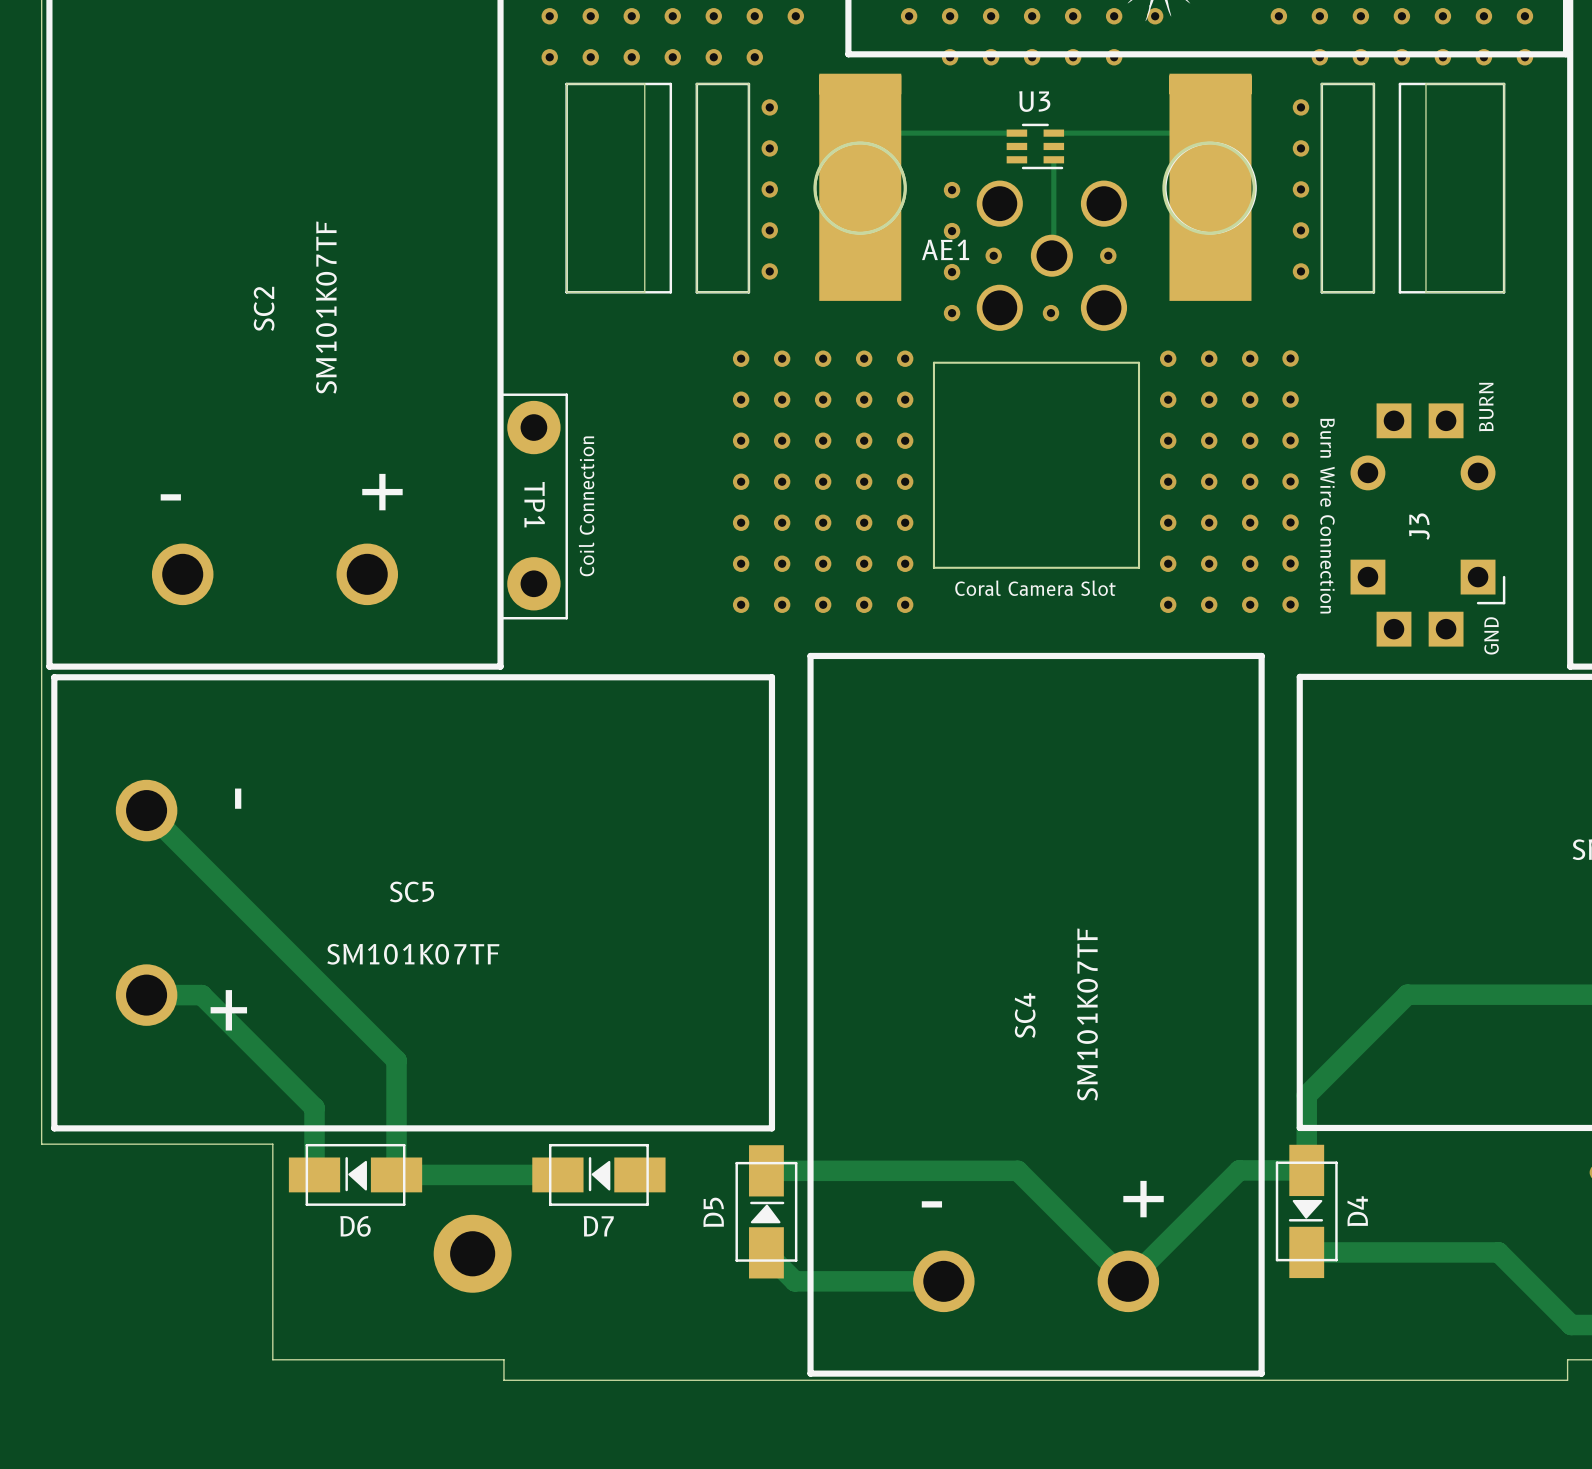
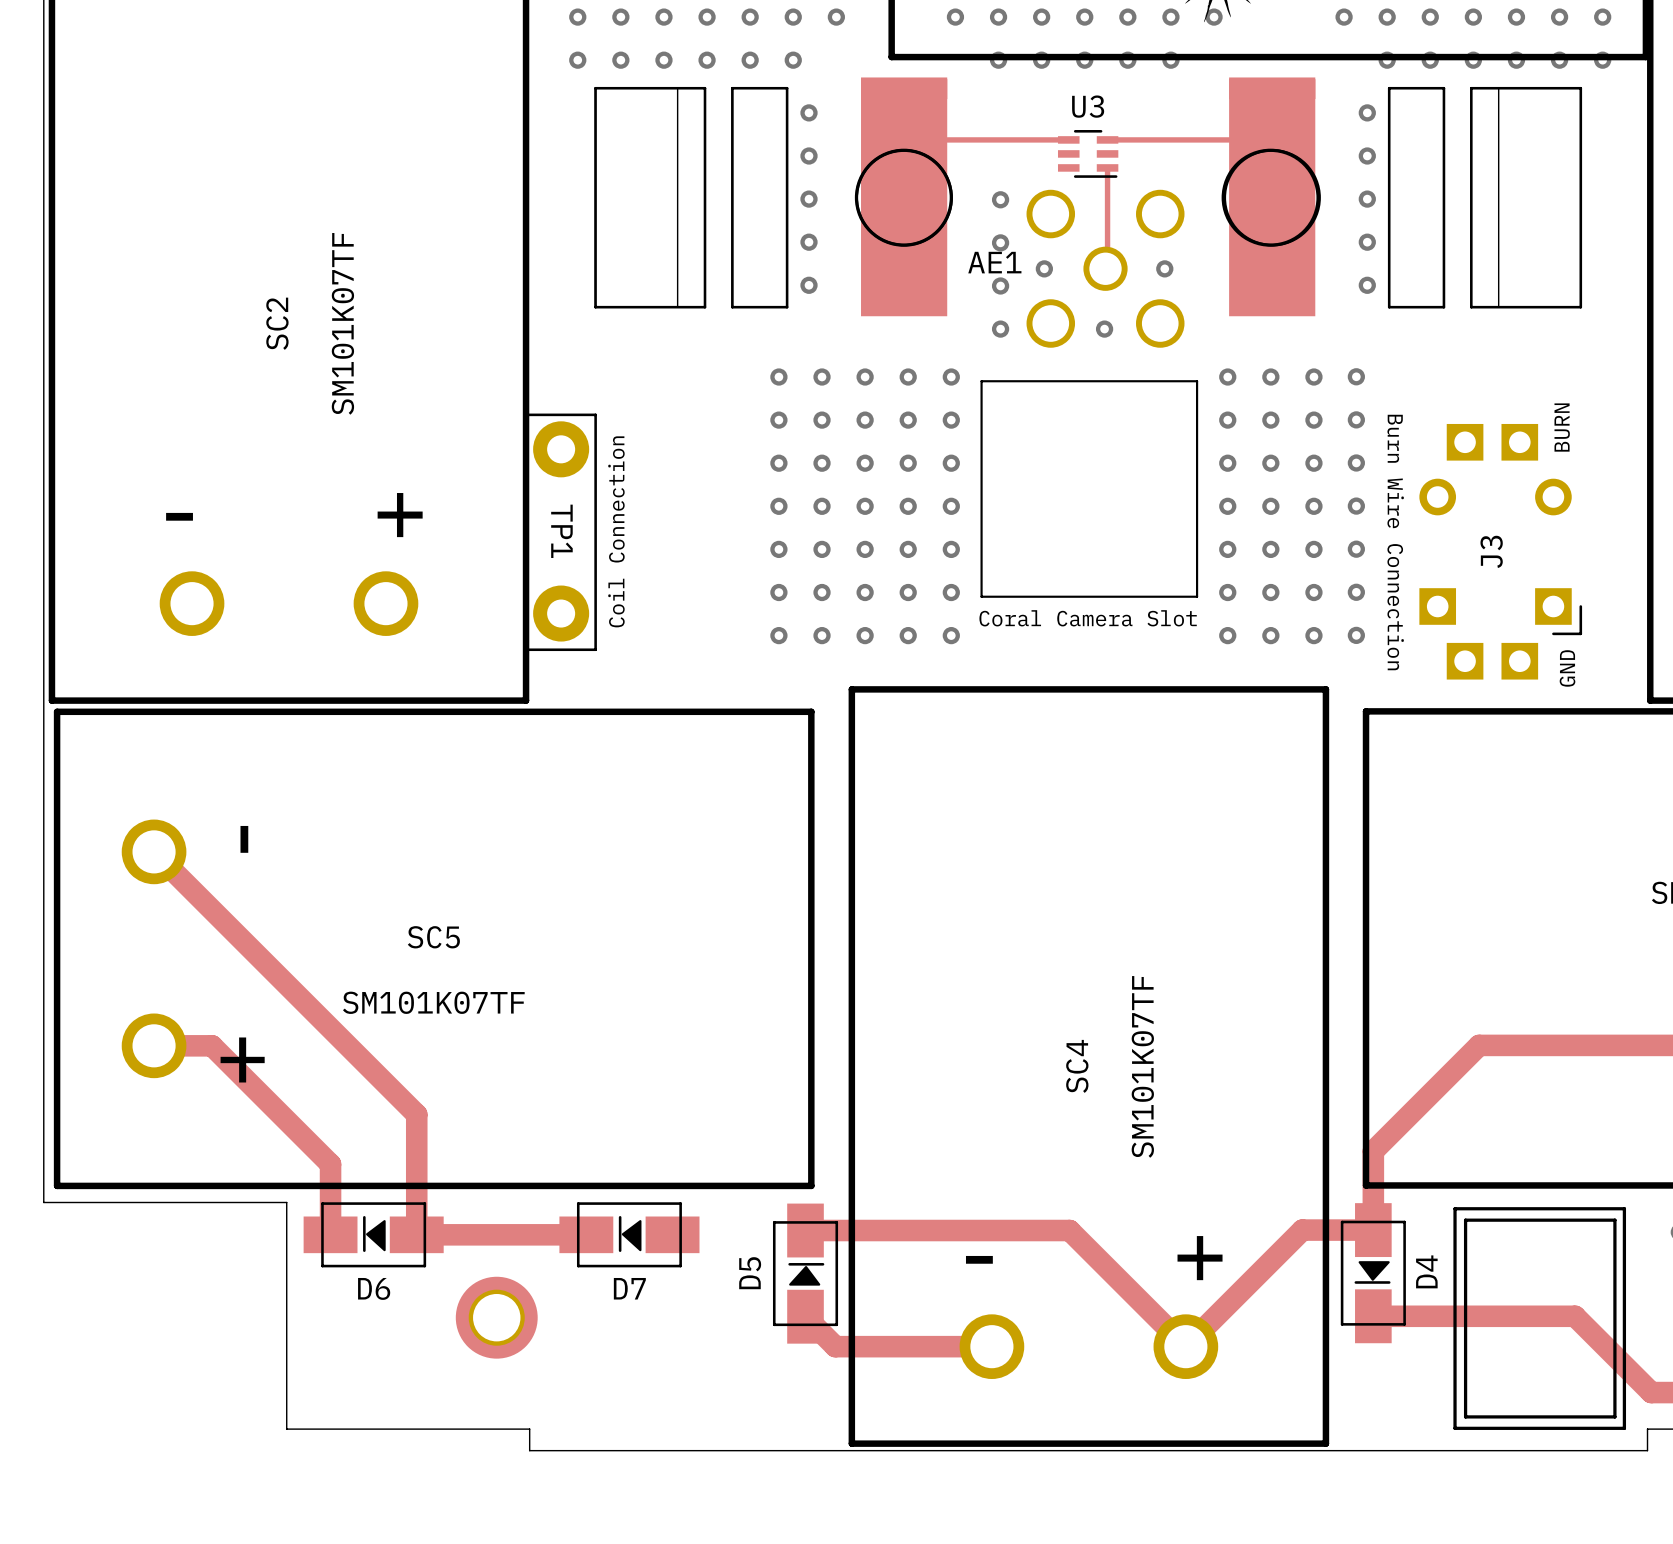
line: none -> (1455, 1208) (1624, 1208) (1624, 1428) (1455, 1428) (1455, 1208)
line: none -> (1465, 1220) (1614, 1220) (1614, 1416) (1465, 1416) (1465, 1220)

